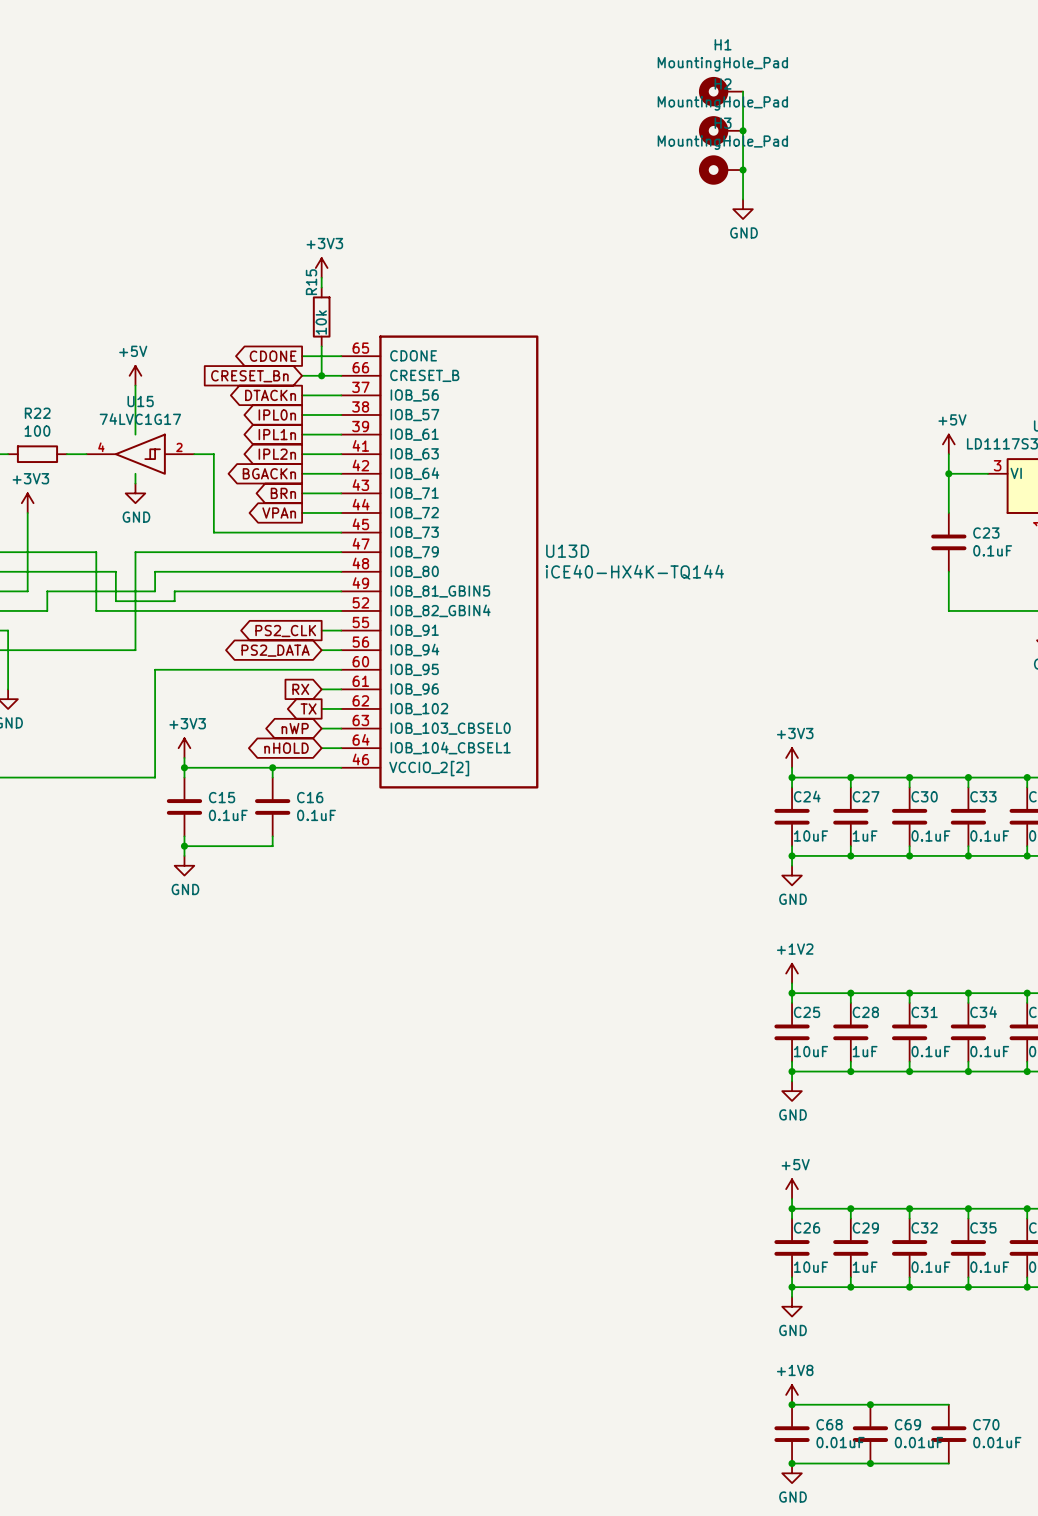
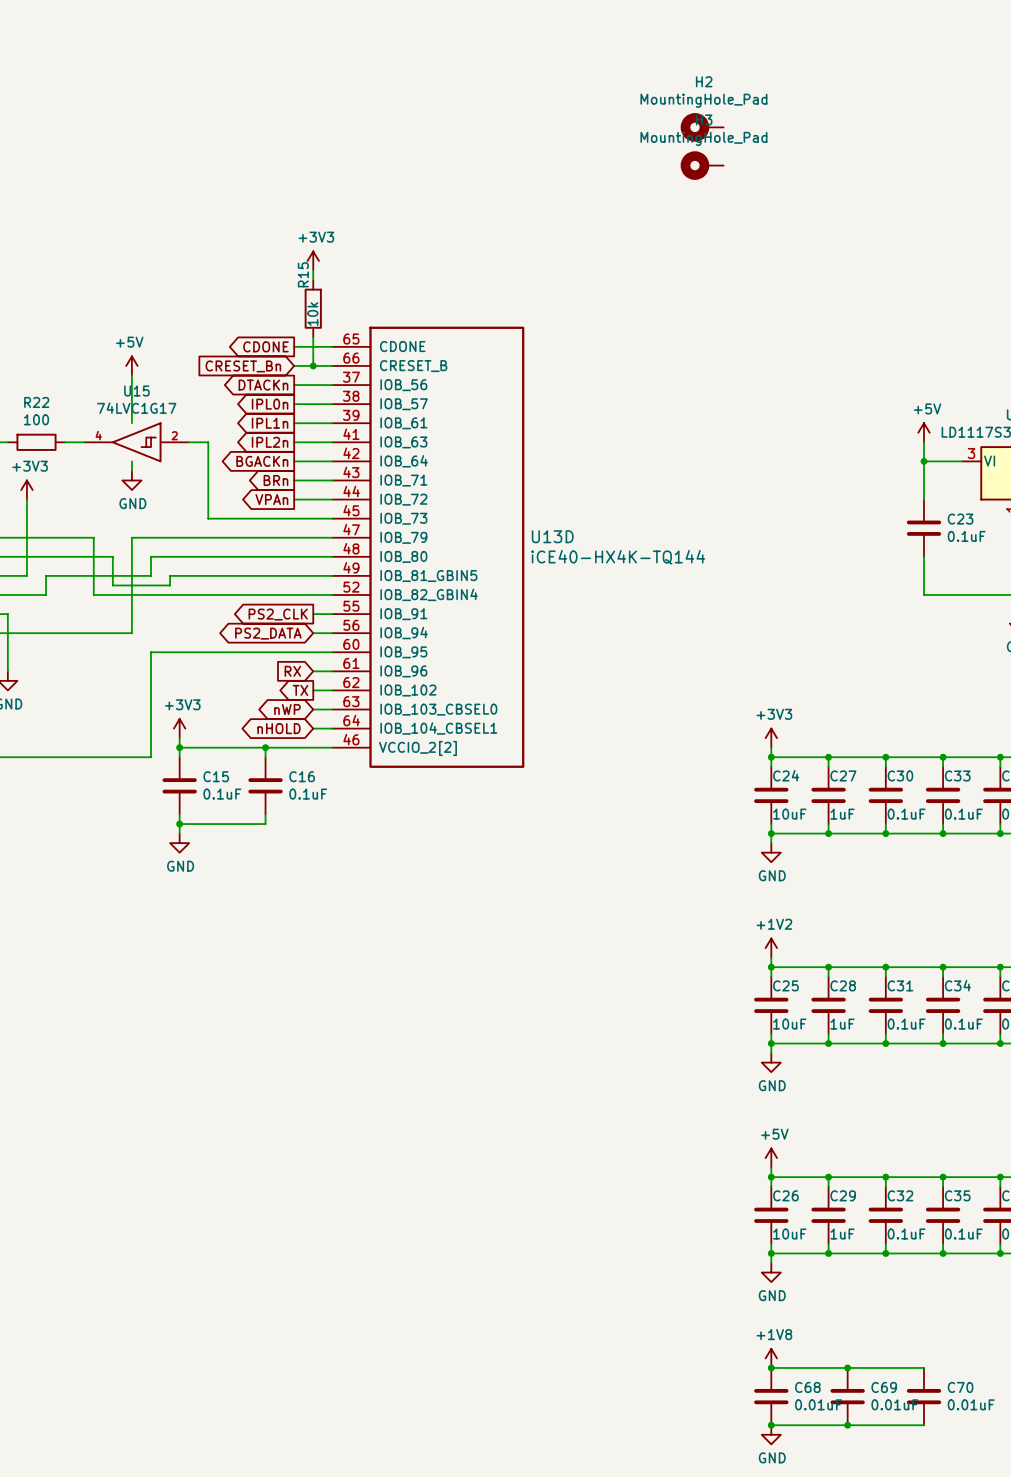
H1: MountingHole_Pad (720, 91) -> none
wire: (743, 91) (743, 199) -> none
junction: (743, 130) -> none
junction: (743, 170) -> none
power symbol: GND (743, 209) -> none

